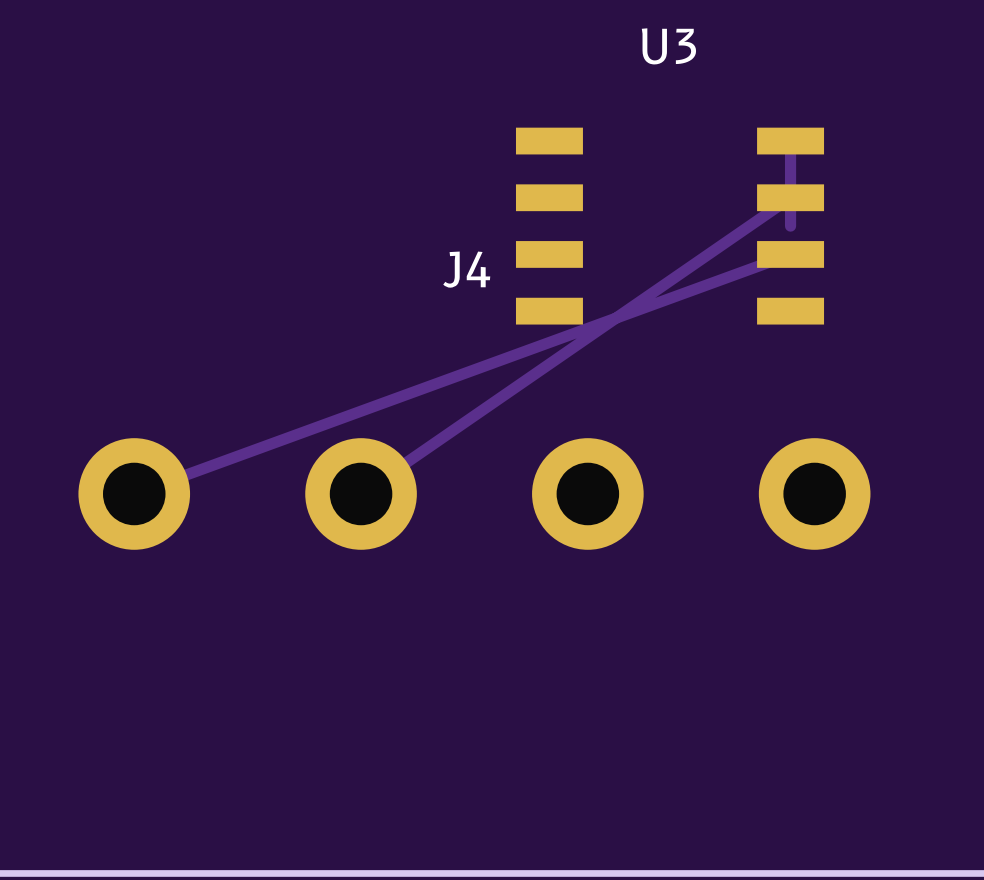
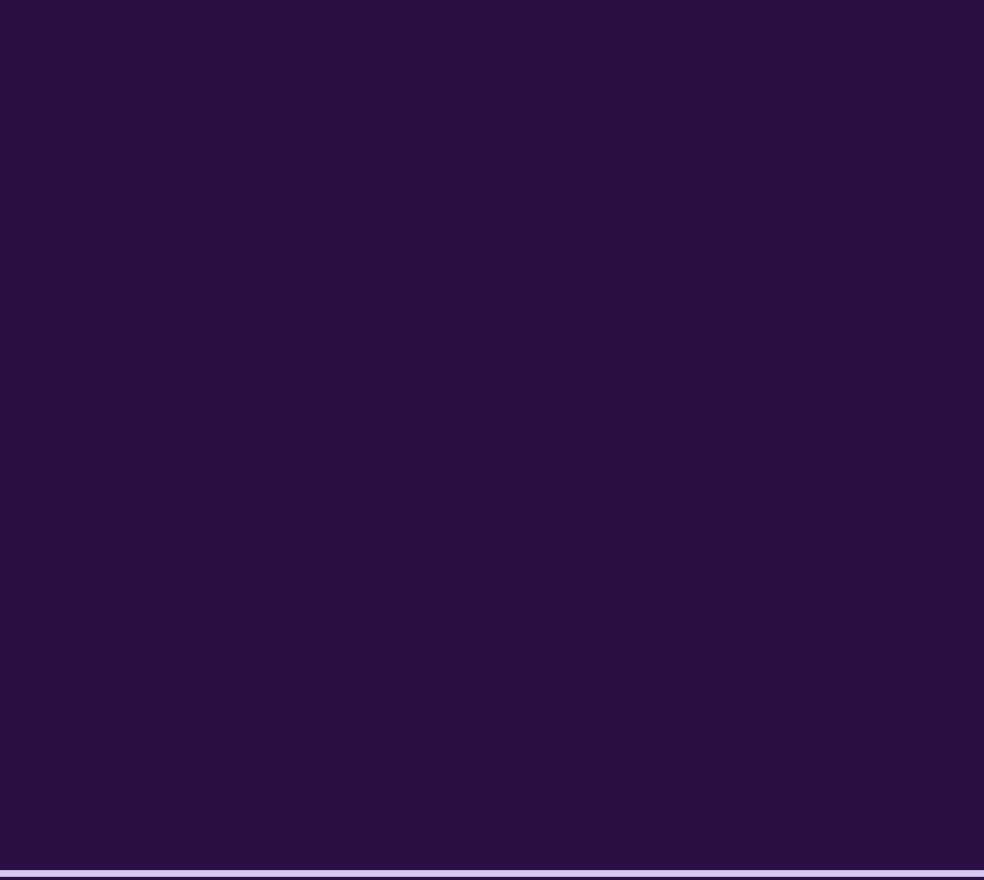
track: (790, 141) (790, 226) -> none
track: (790, 197) (361, 493) -> none
U3: (670, 226) -> none
track: (790, 254) (134, 493) -> none
J4: (474, 493) -> none

